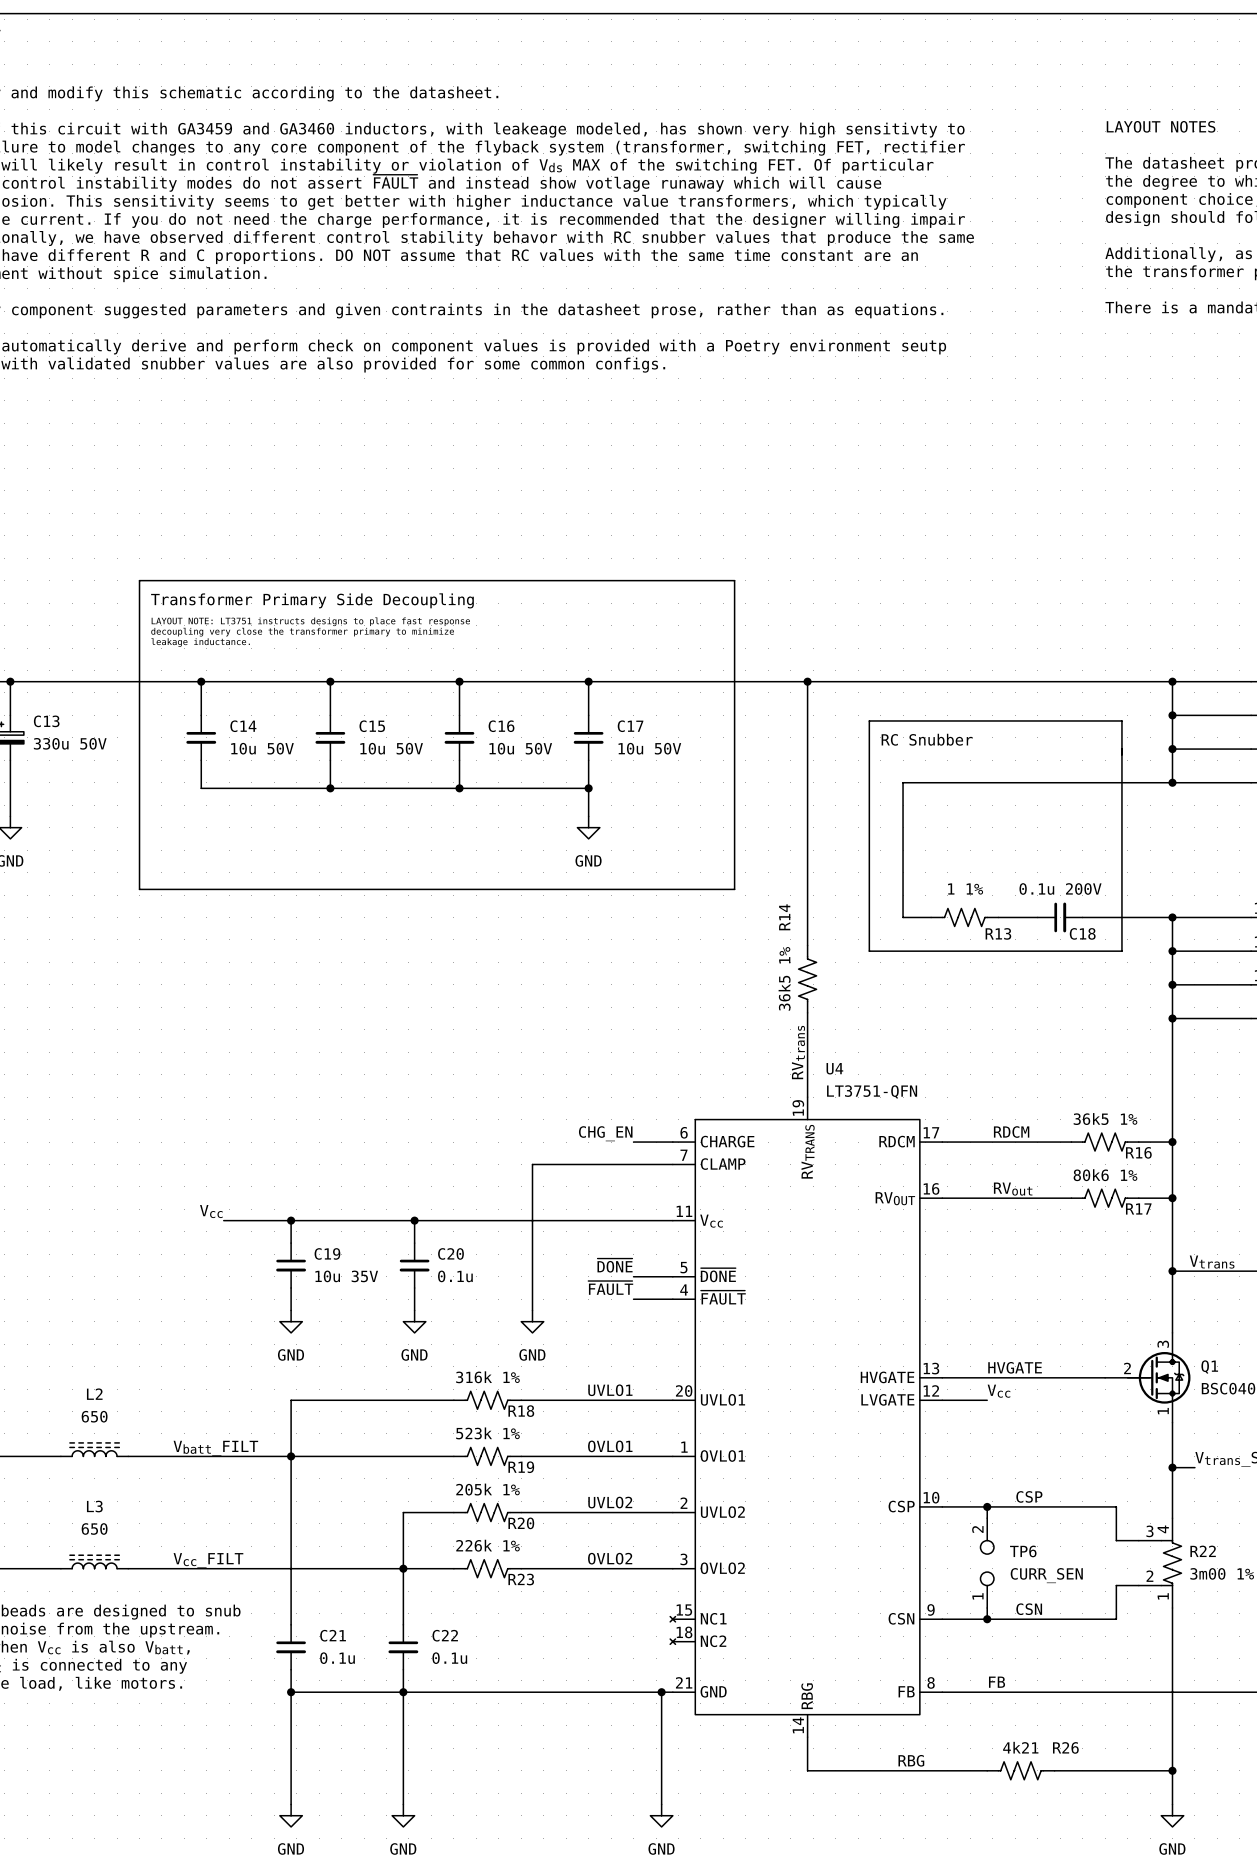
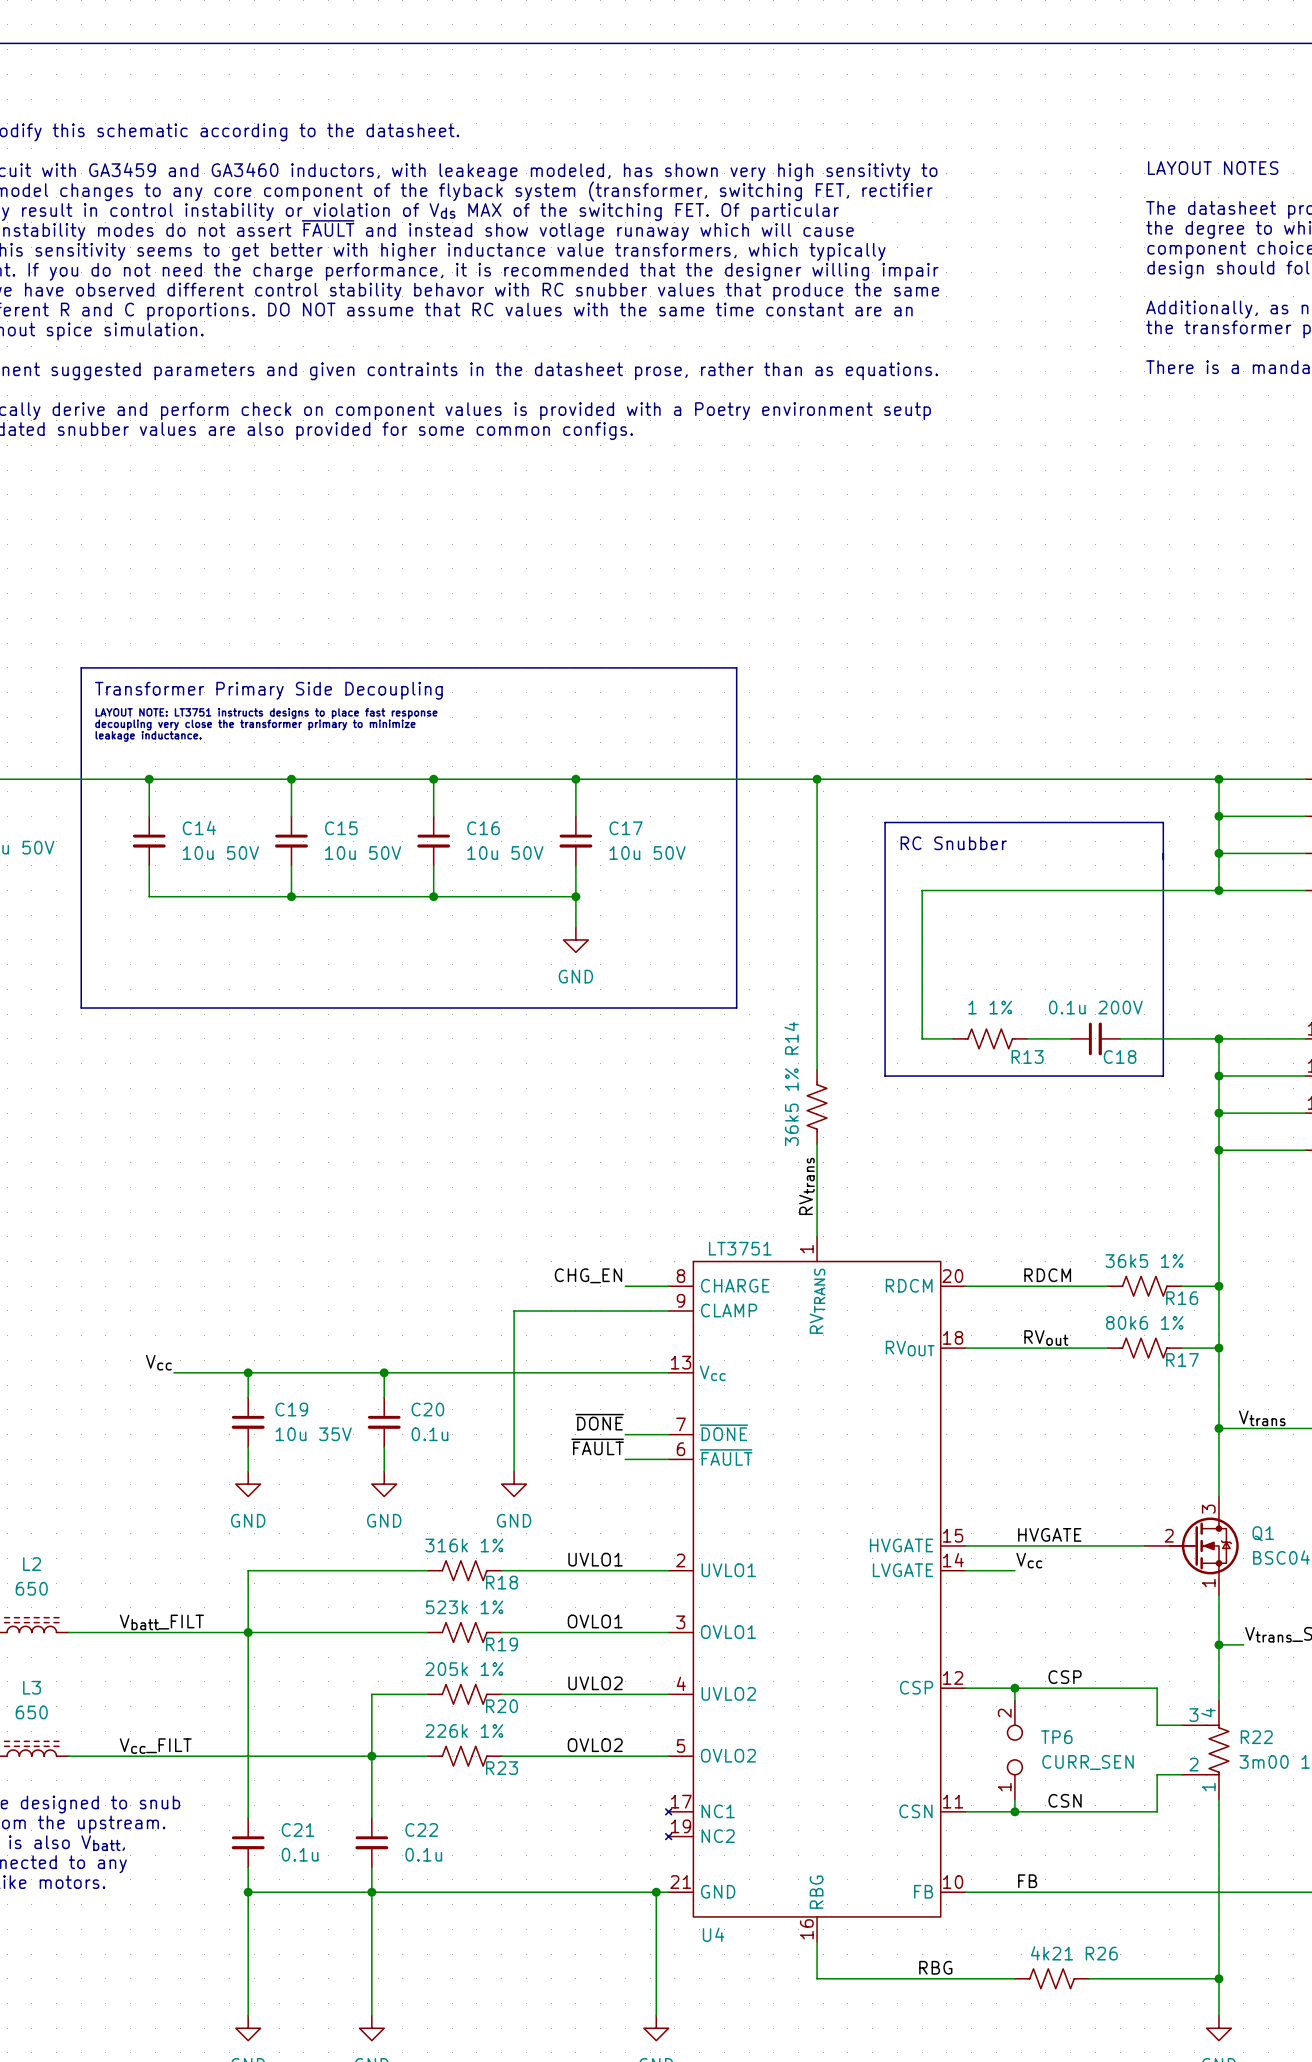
U4 name position: U4 (834, 1068) -> U4 (713, 1934)
U4 value: LT3751-QFN (872, 1092) -> LT3751 (740, 1248)
U4 symbol: [670, 1097, 943, 1738] -> [665, 1236, 966, 1942]

